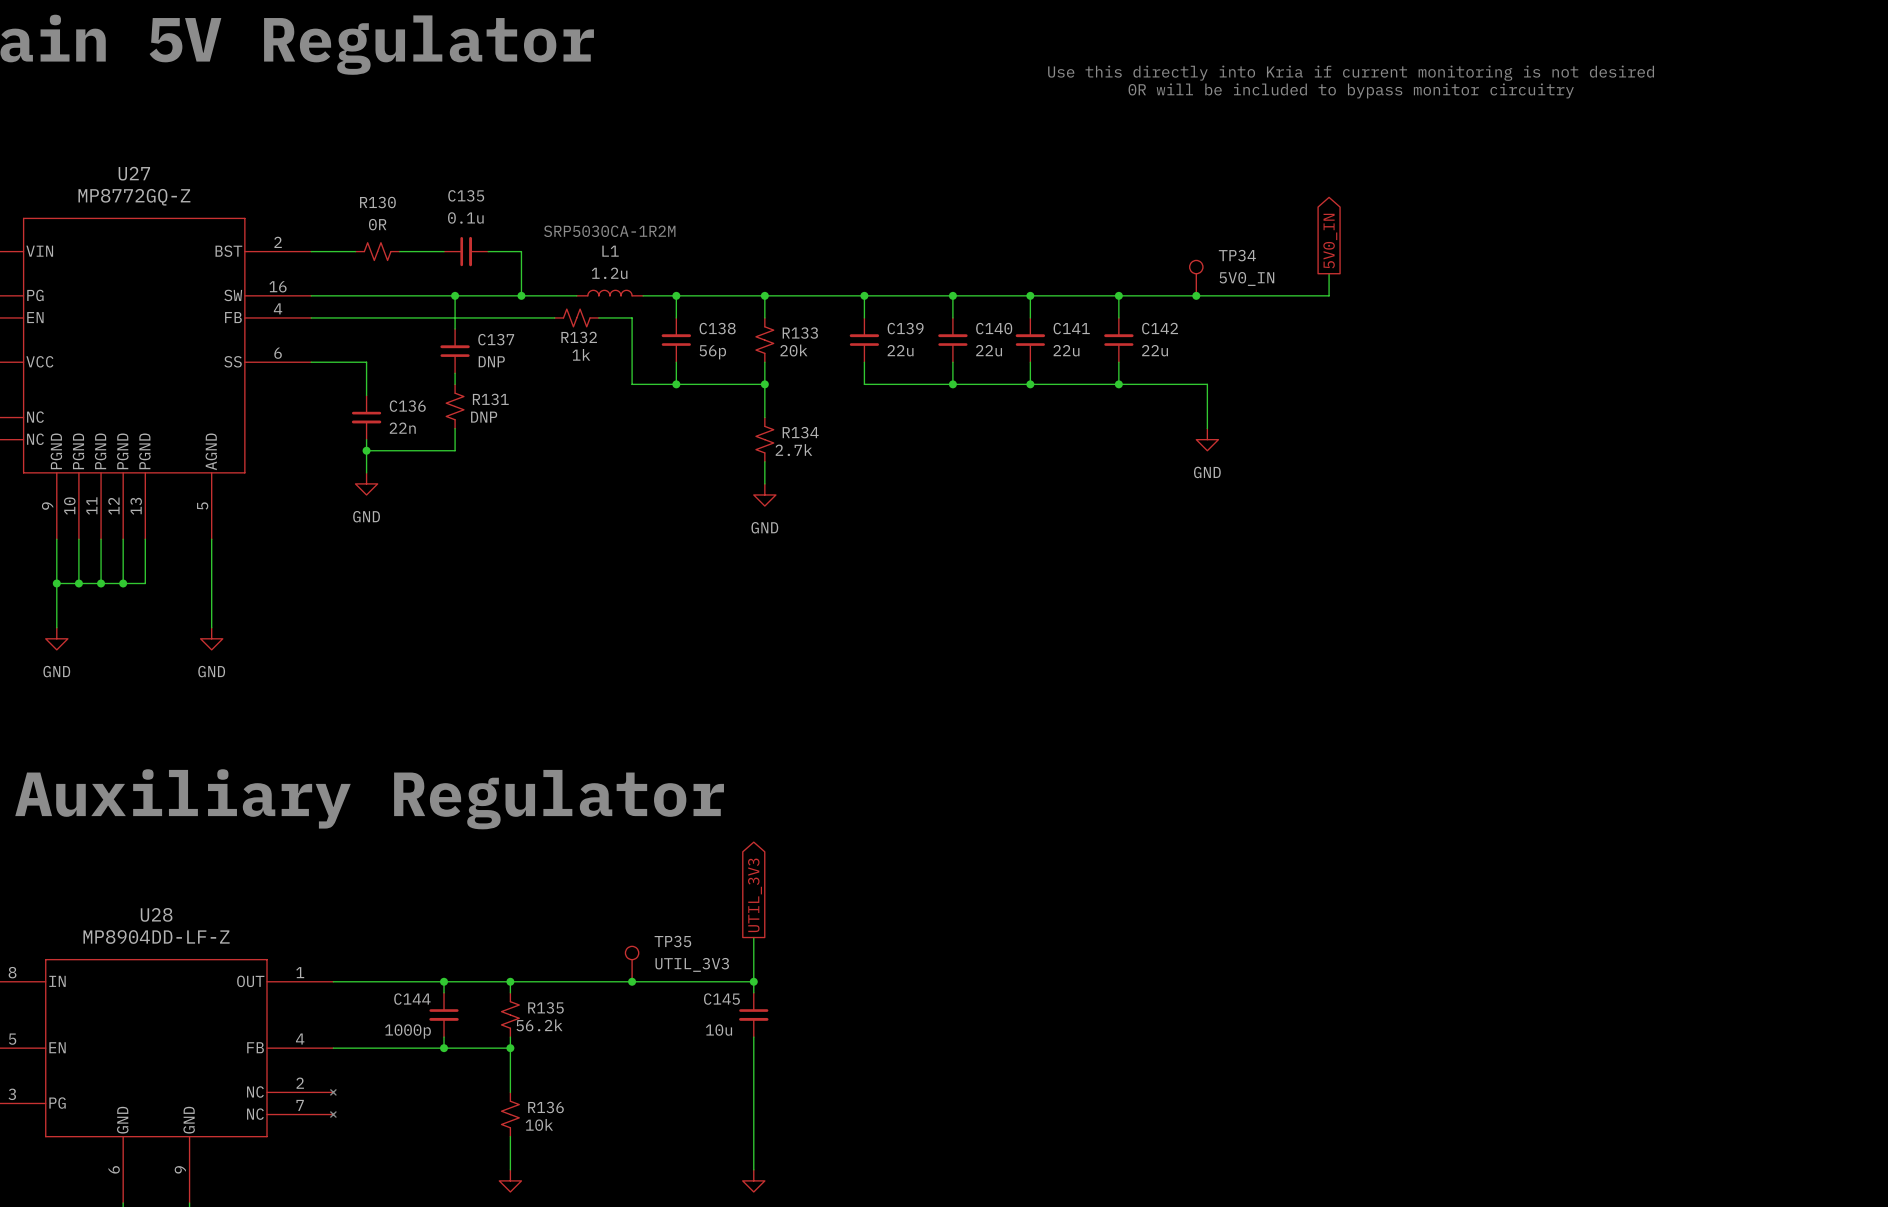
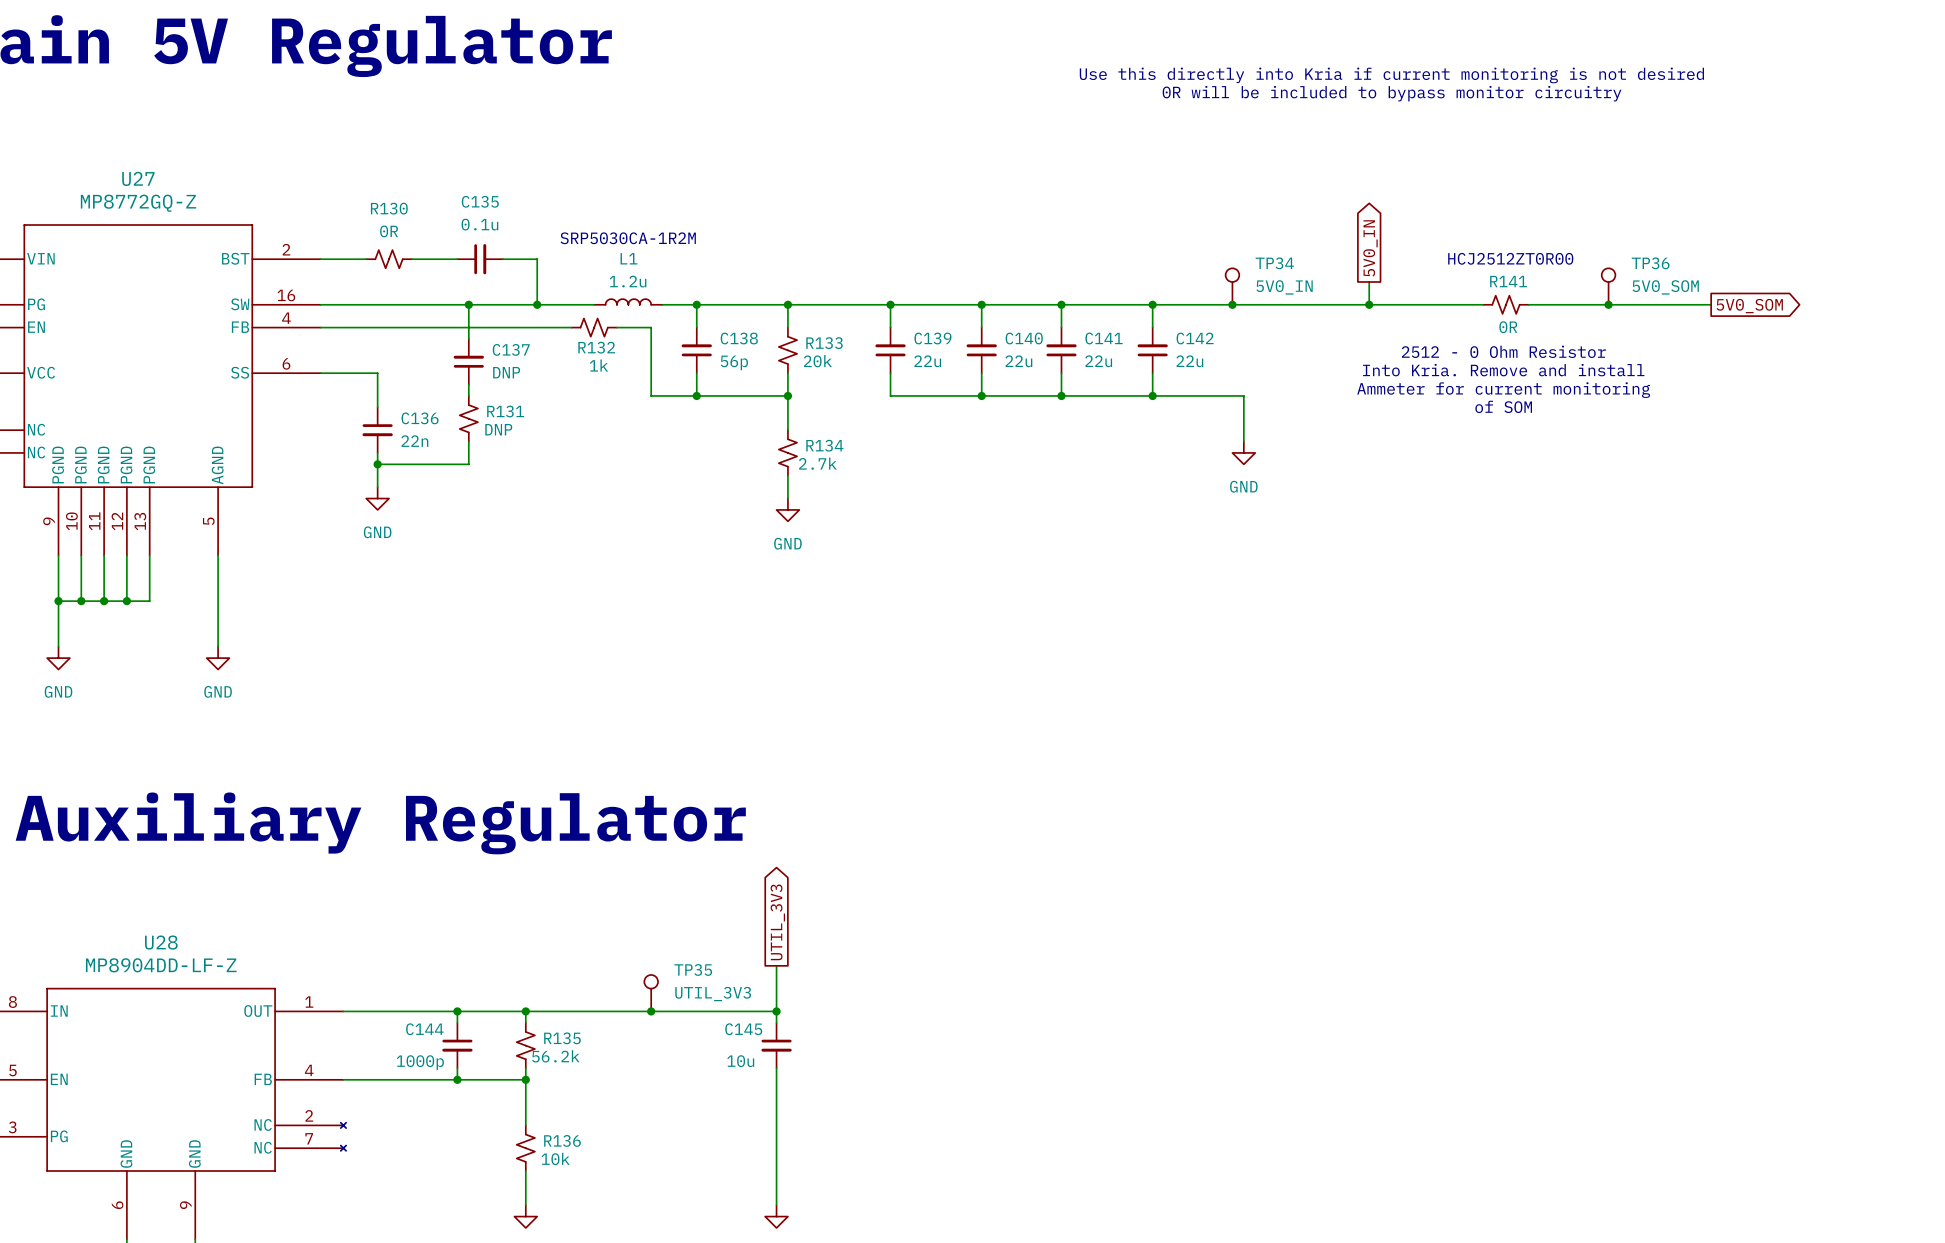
text: none -> HCJ2512ZT0R00 (1510, 258)
TP36: none -> 5V0_SOM (1608, 286)
wire: none -> (1369, 304) (1483, 304)
junction: none -> (1369, 304)
R141: none -> 0R (1505, 304)
wire: none -> (1528, 304) (1711, 304)
junction: none -> (1608, 304)
global label: none -> 5V0_SOM (1749, 306)
text: none -> 2512 - 0 Ohm Resistor (1503, 351)
text: none -> Into Kria. Remove and install (1503, 370)
text: none -> Ammeter for current monitoring (1503, 390)
text: none -> of SOM (1503, 406)

